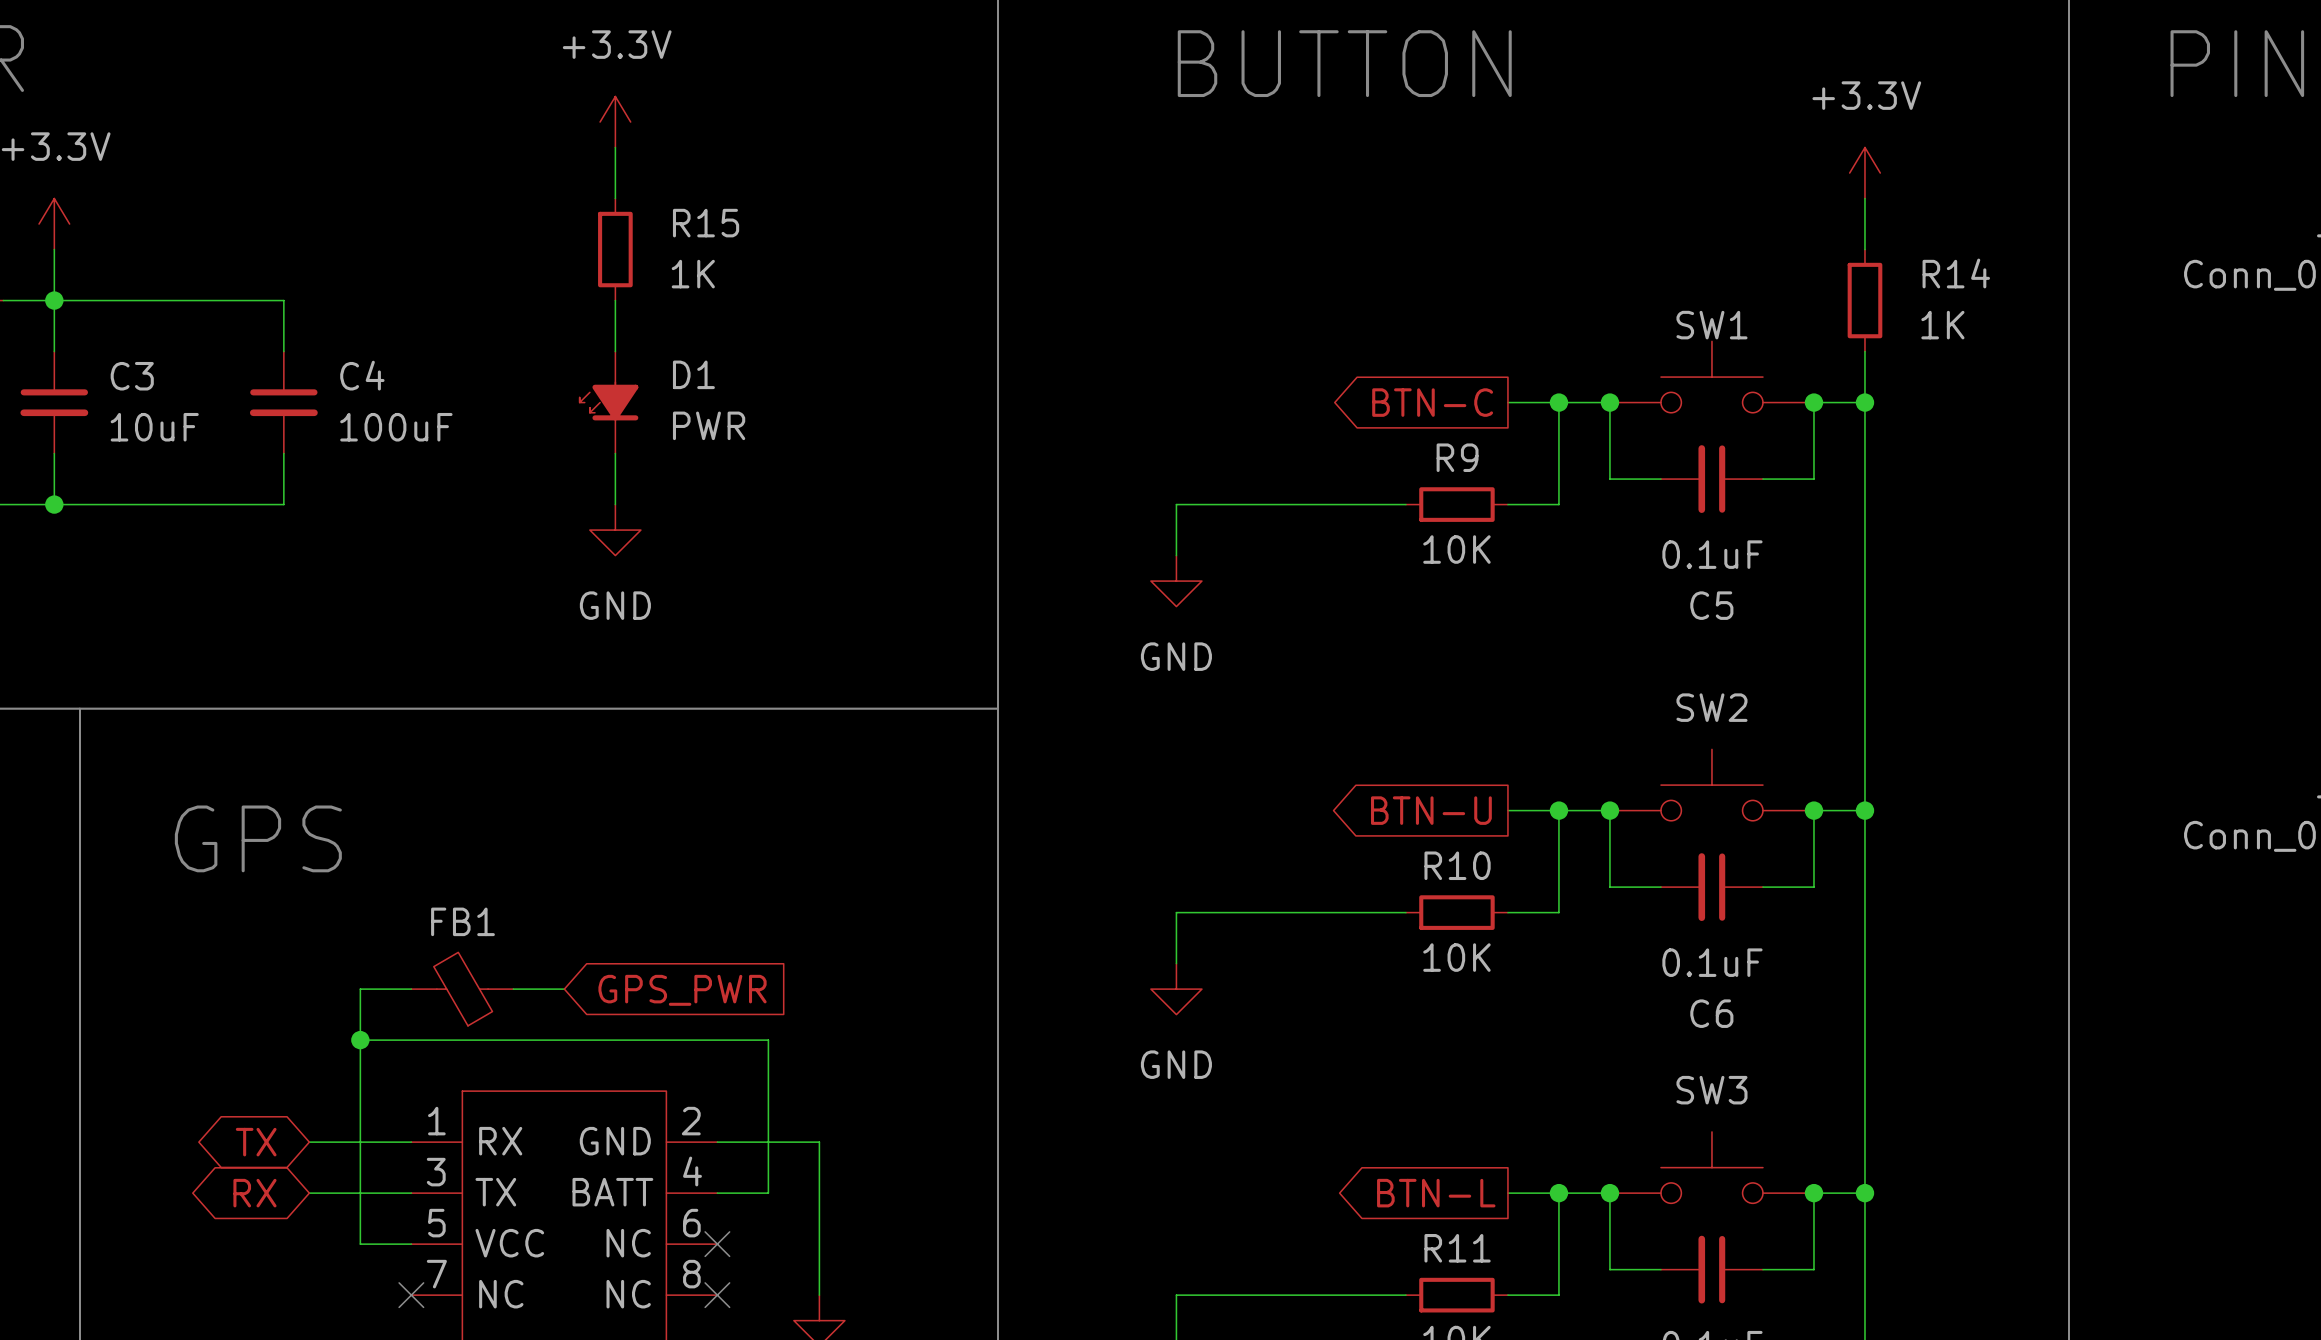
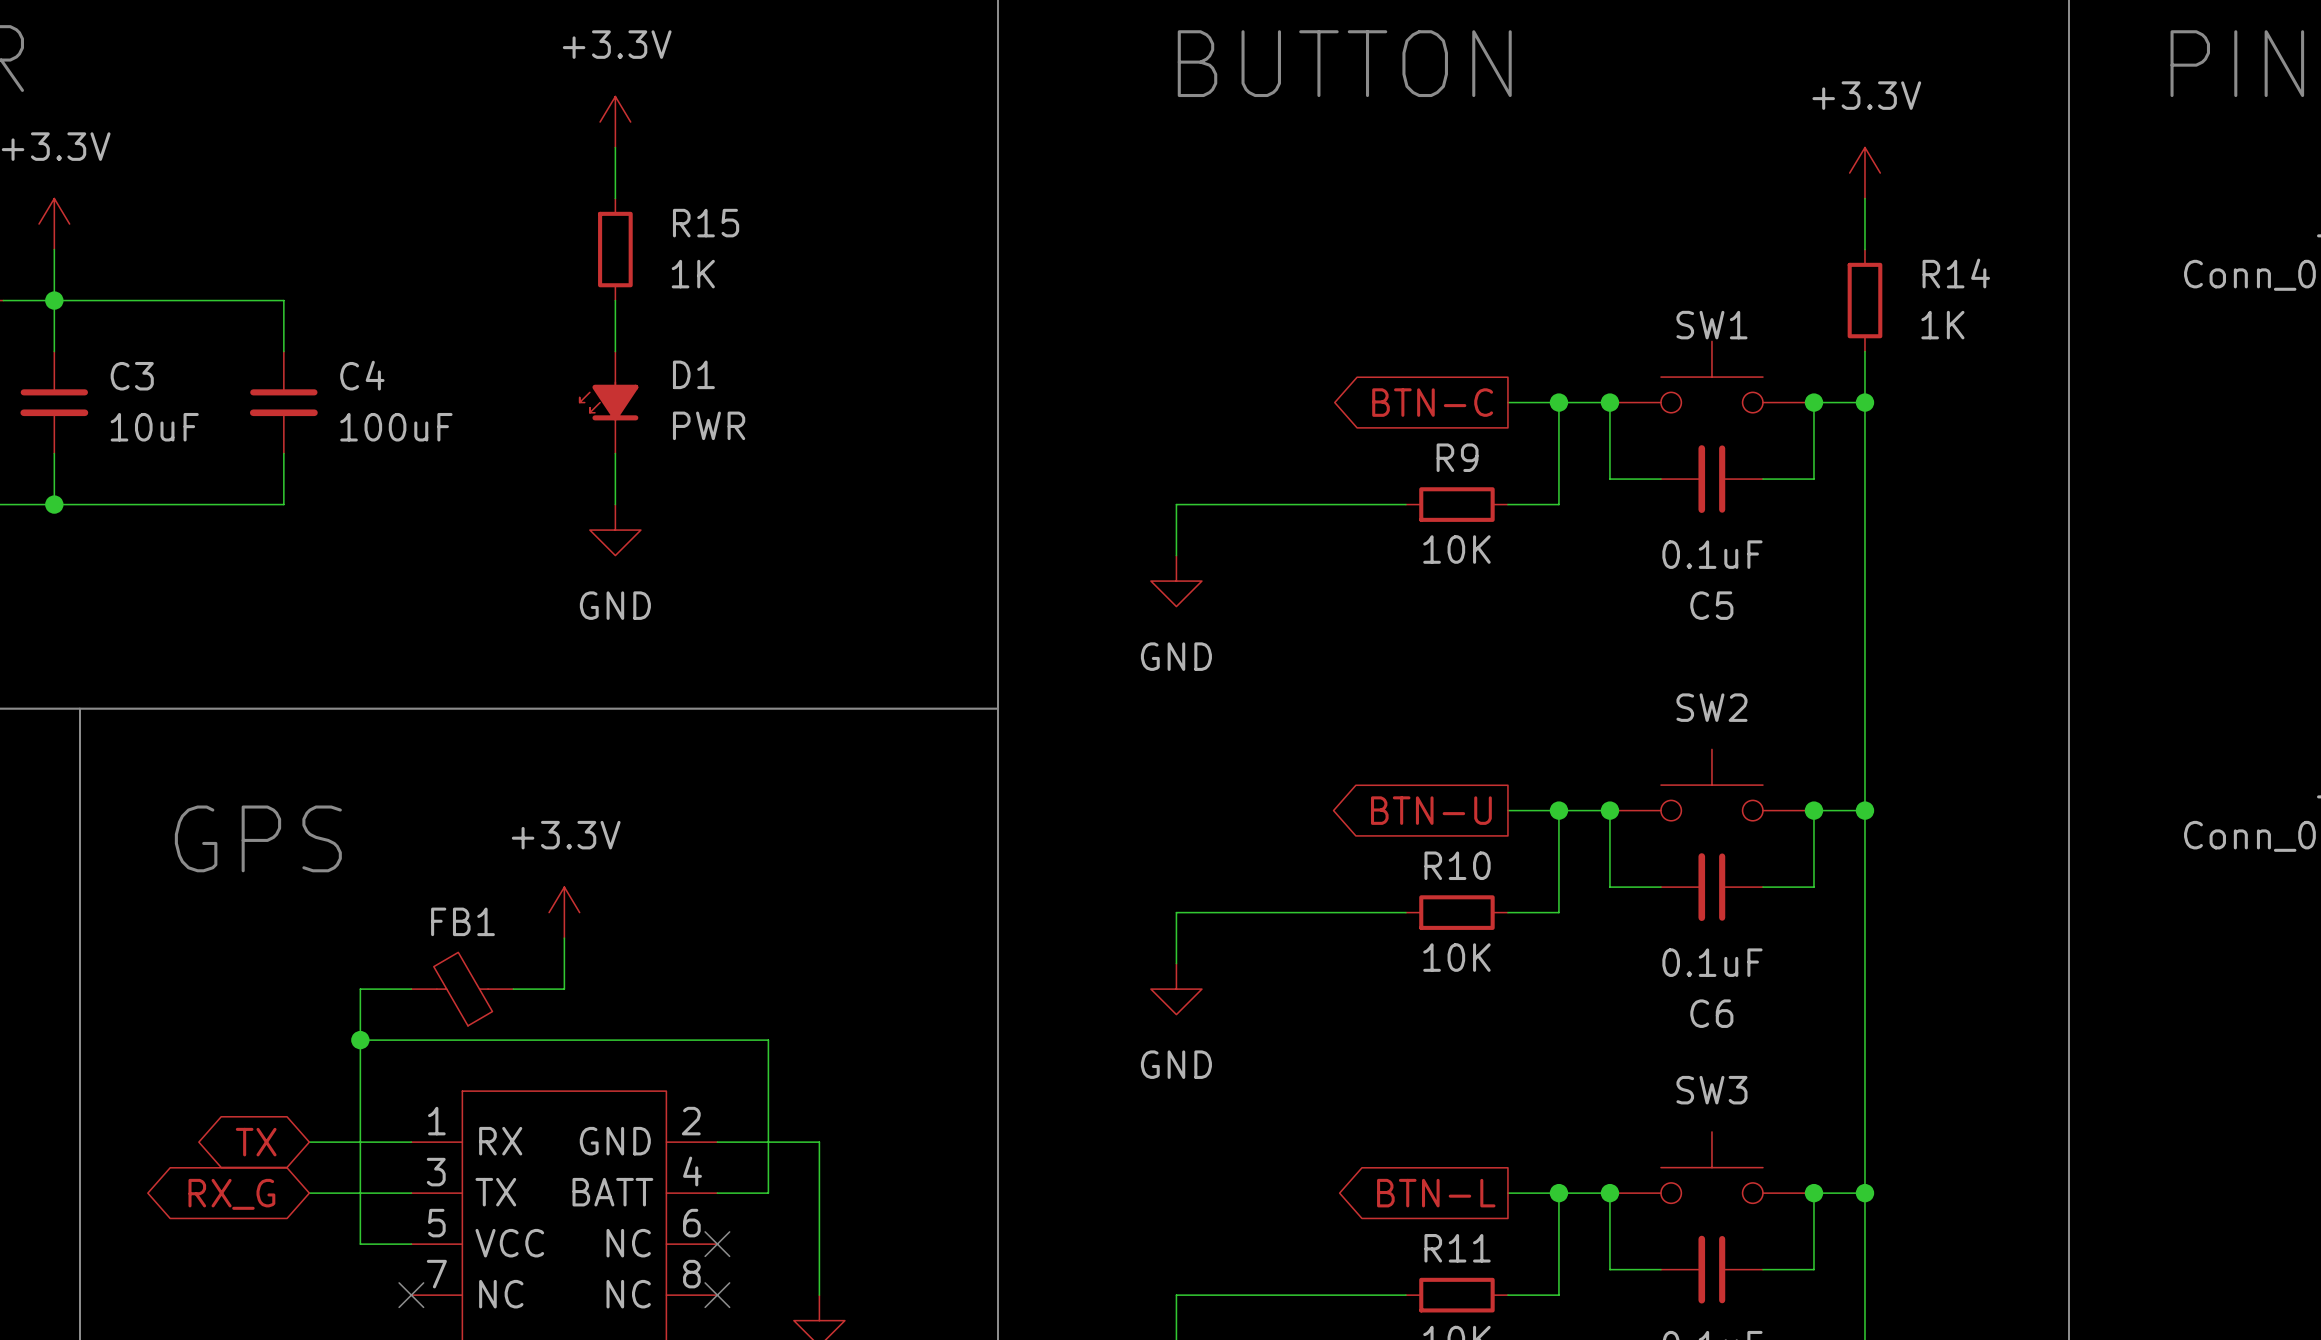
power symbol: none -> +3.3V (564, 912)
wire: none -> (564, 938) (564, 989)
global label: GPS_PWR (682, 990) -> none
global label: RX (254, 1193) -> RX_G (231, 1194)

